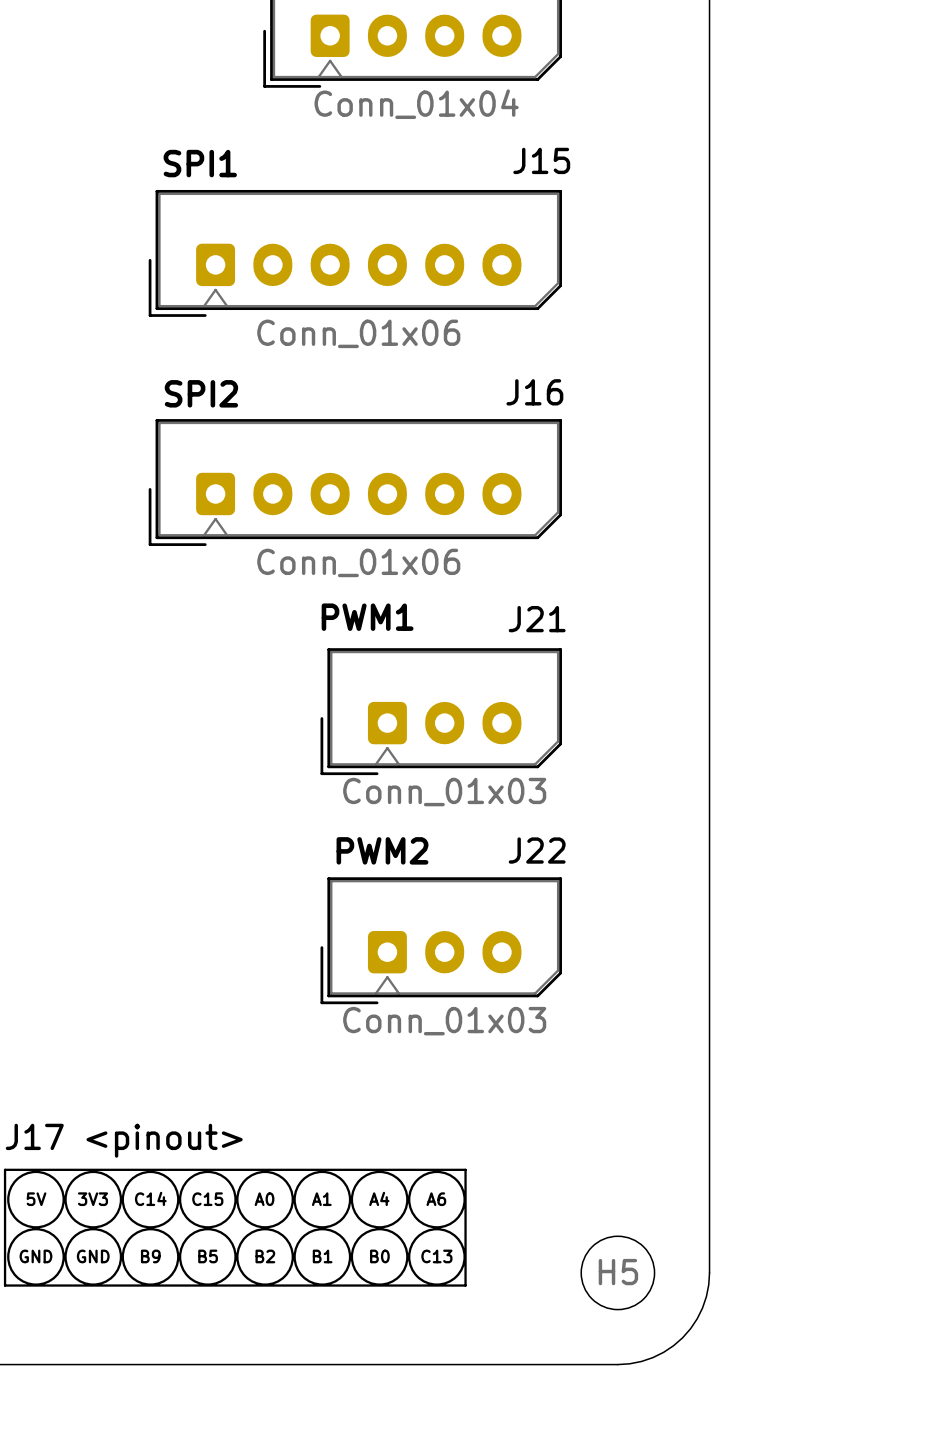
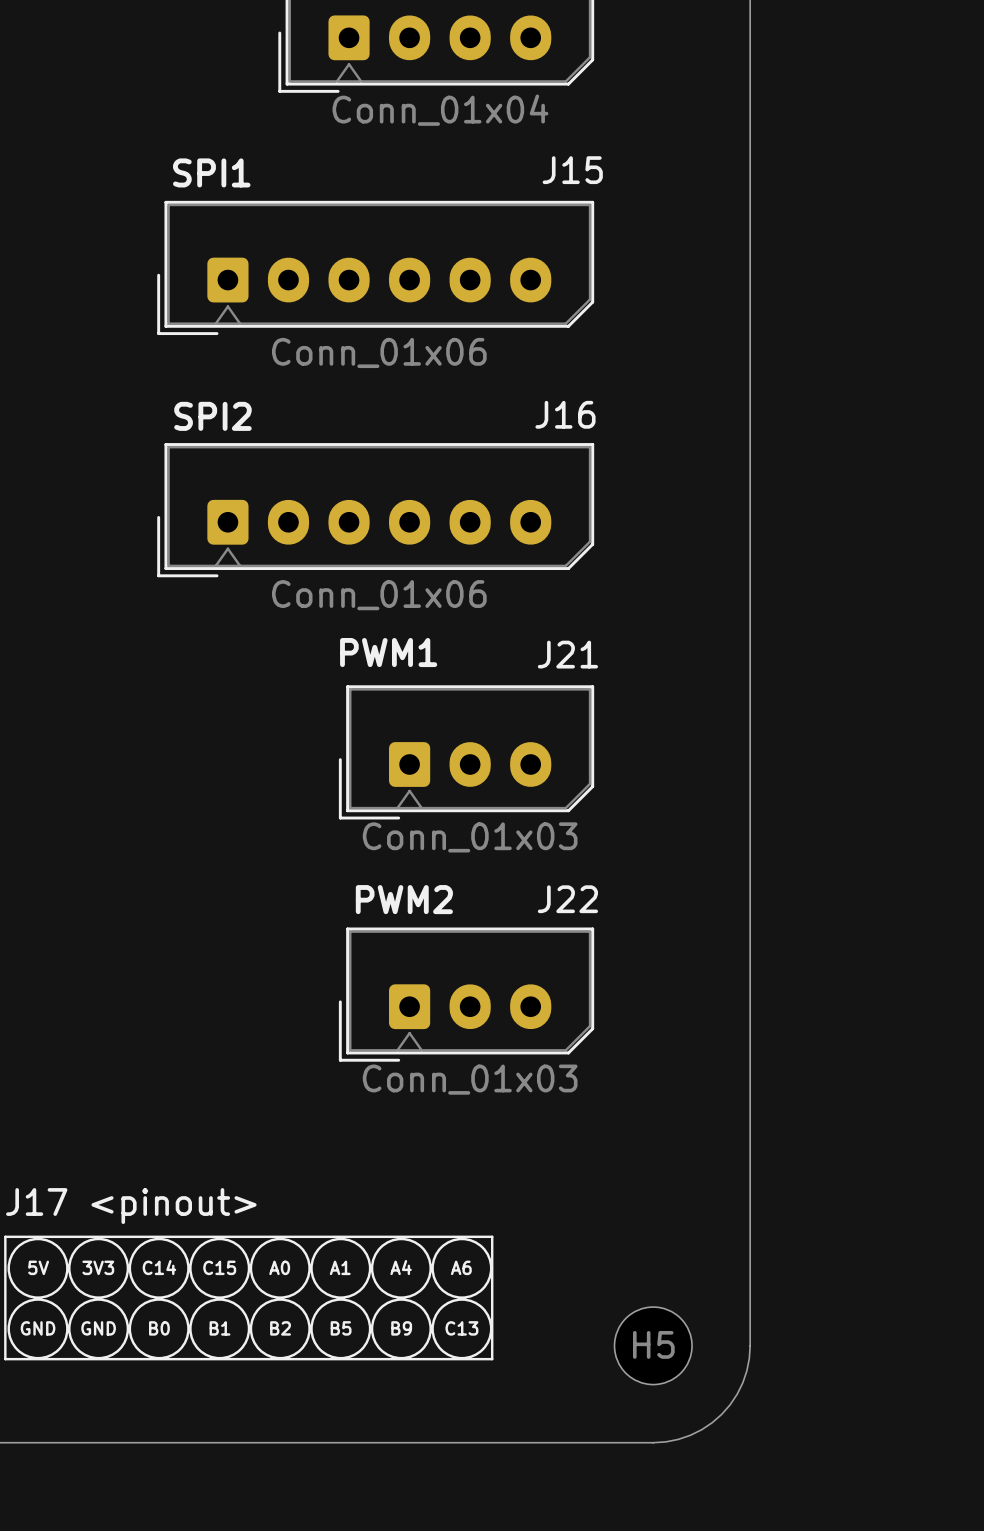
text: B9 (150, 1256) -> B0 (159, 1328)
text: B5 (208, 1256) -> B1 (219, 1328)
text: B1 (322, 1256) -> B5 (341, 1328)
text: B0 (379, 1256) -> B9 (401, 1328)

